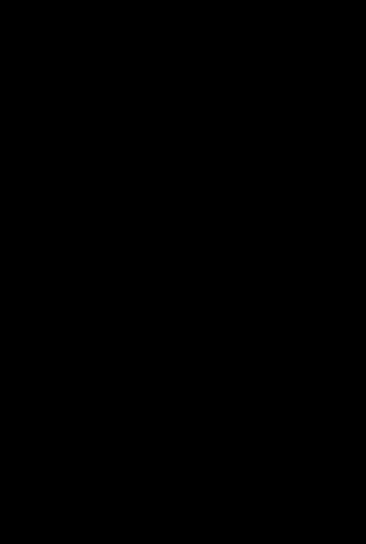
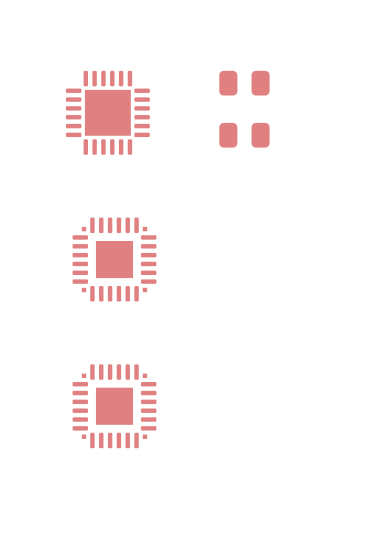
part: none -> (244, 83)
part: none -> (107, 112)
part: none -> (244, 135)
part: none -> (114, 259)
part: none -> (114, 406)

